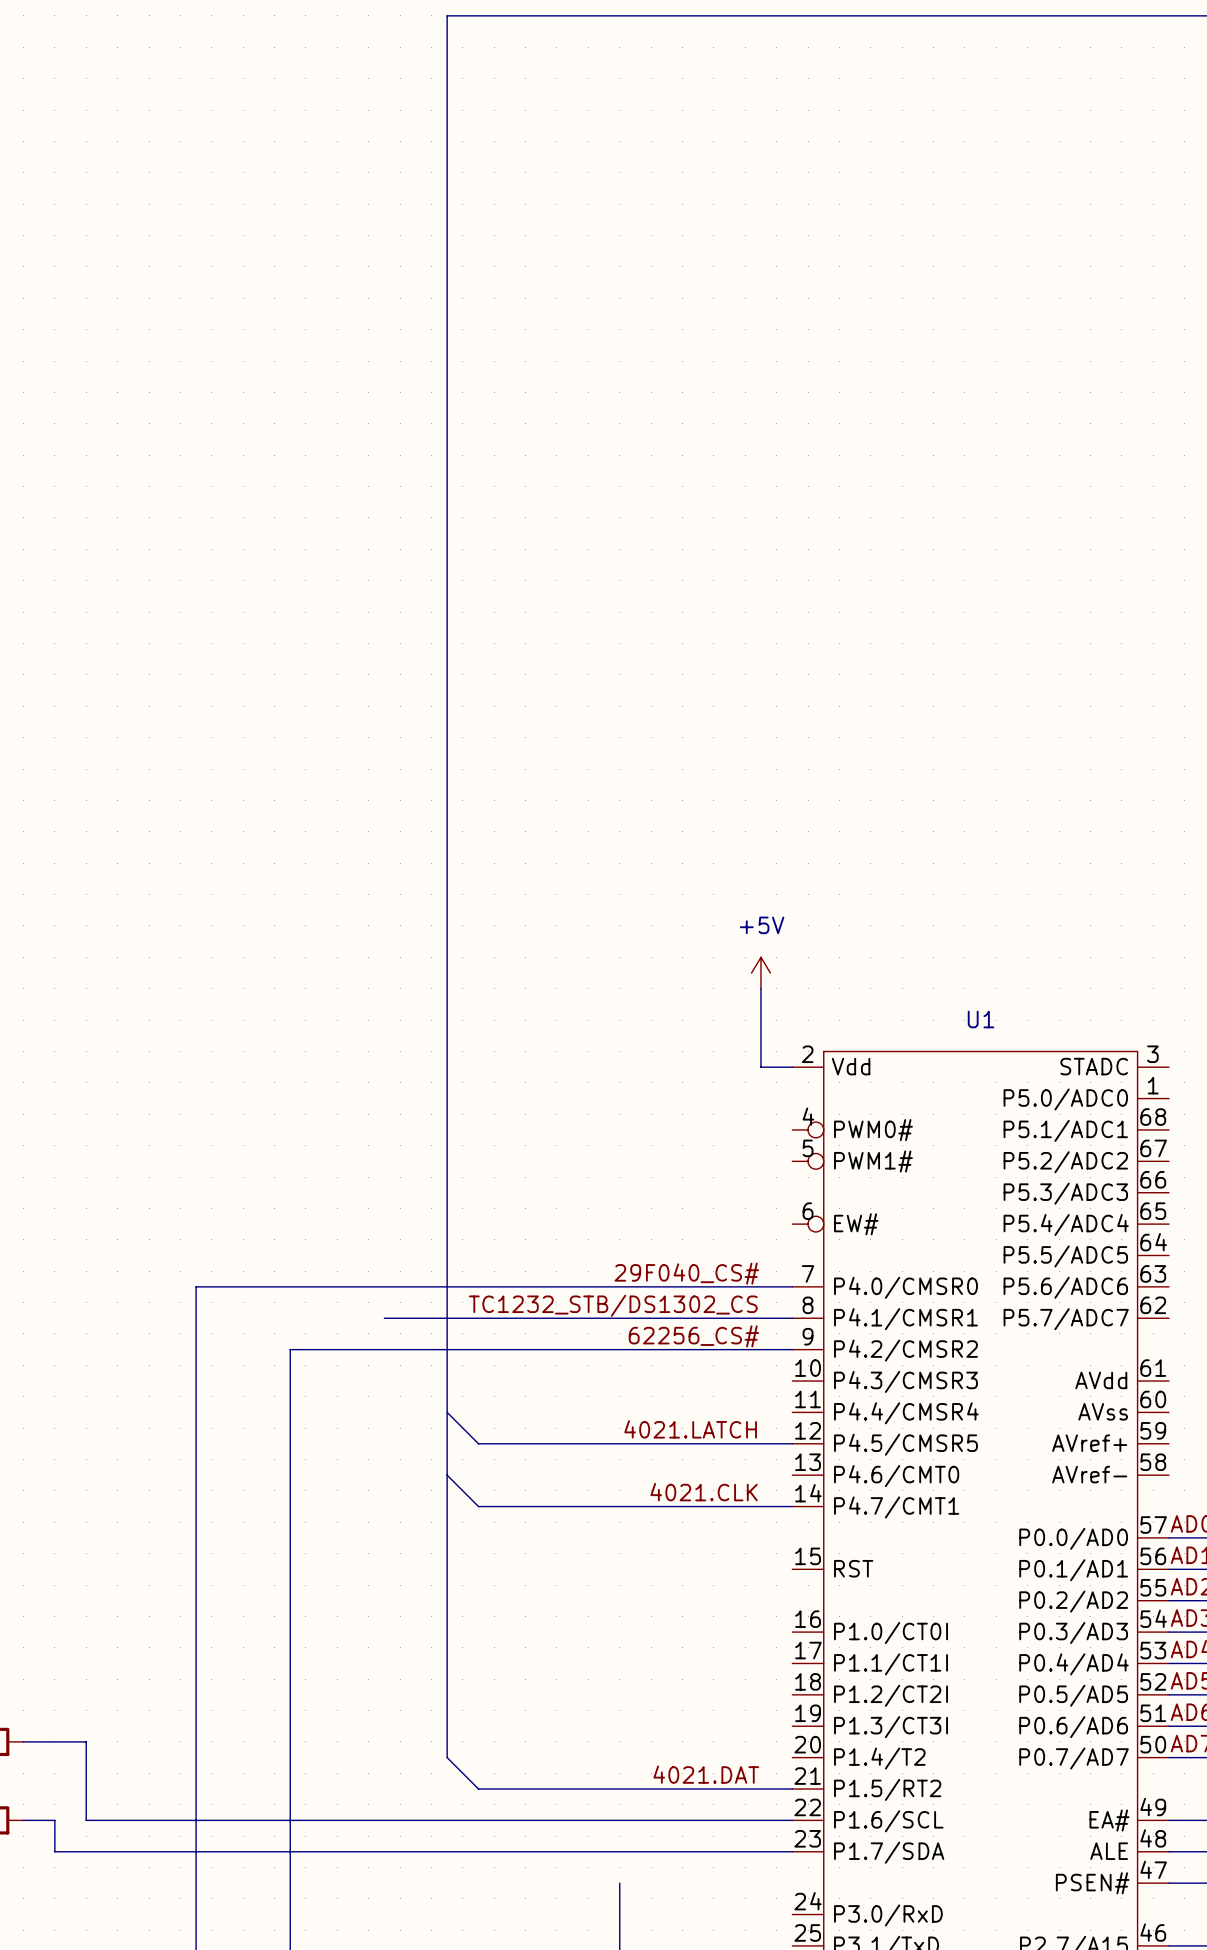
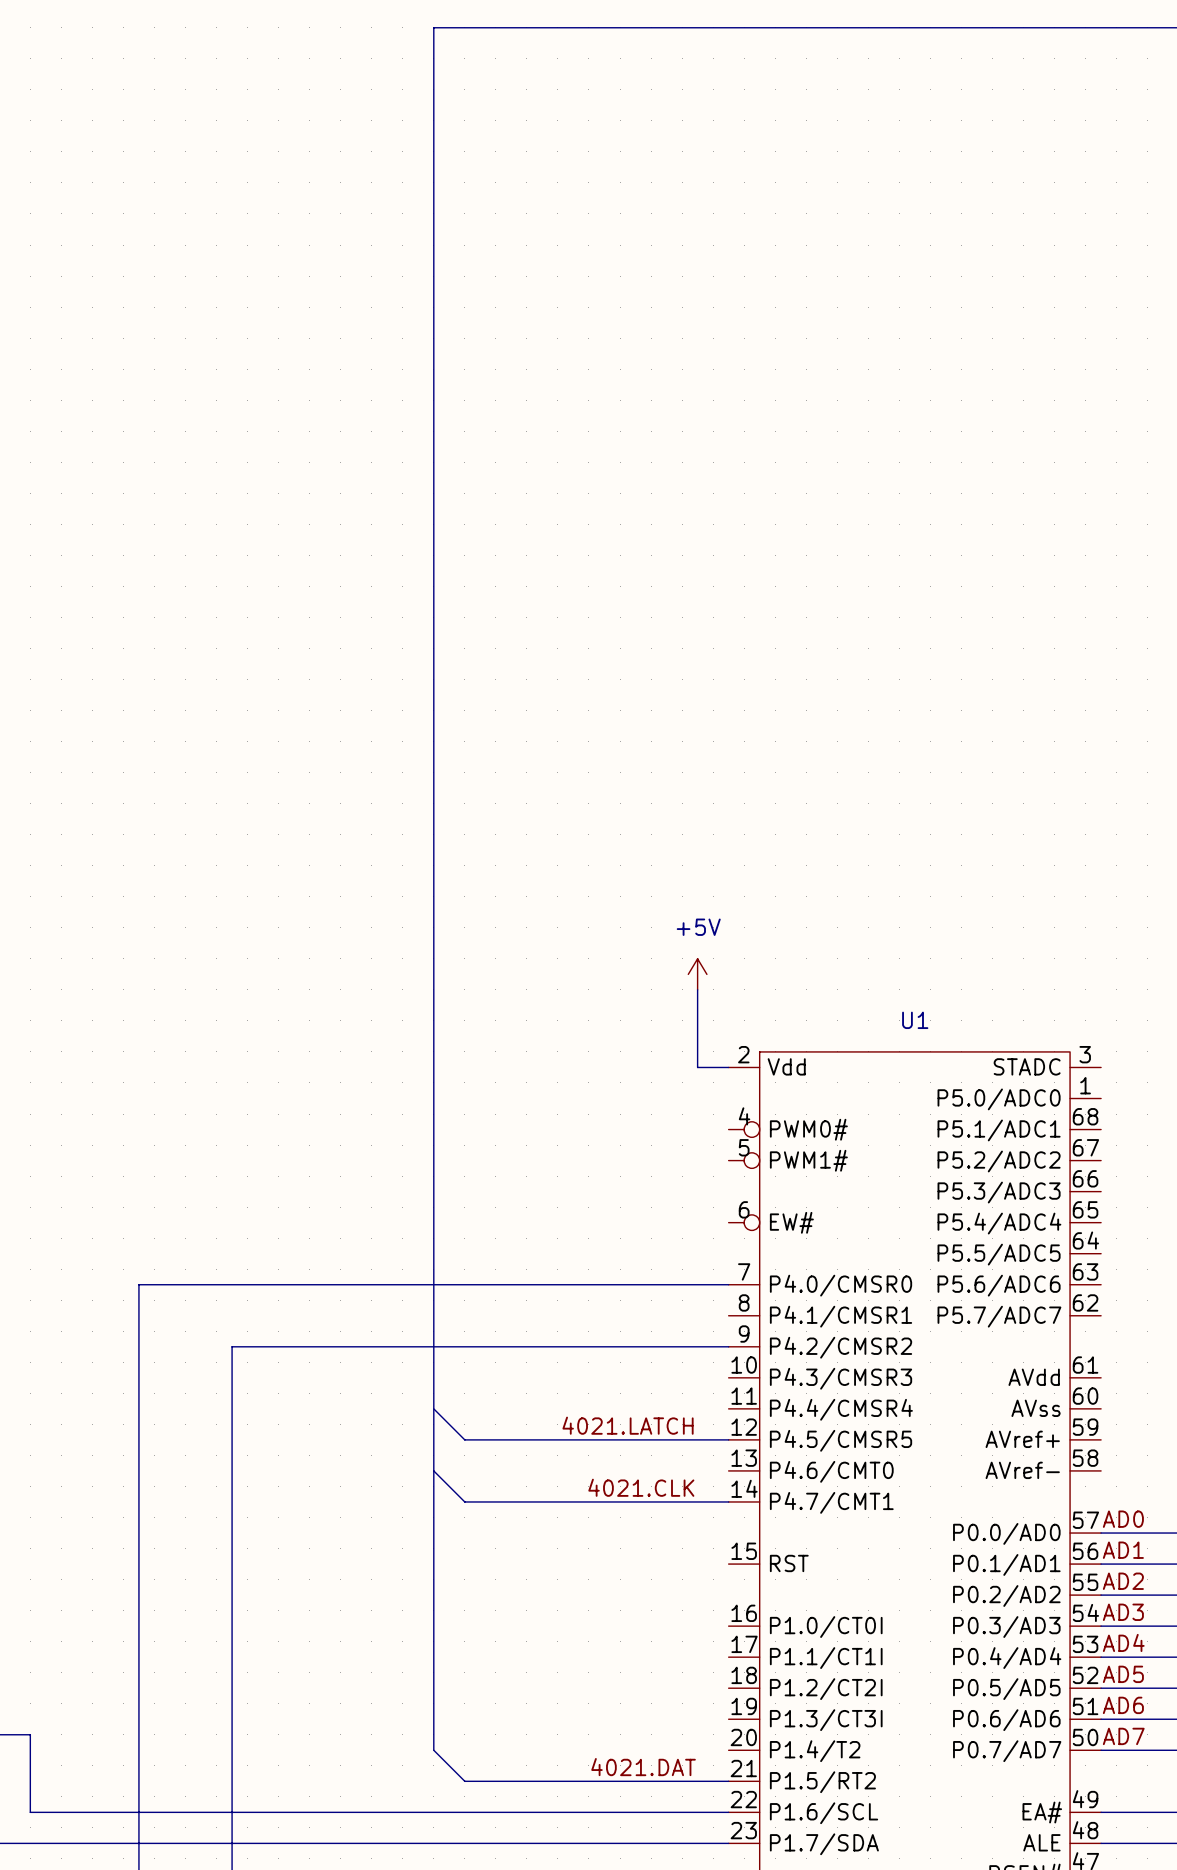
bus: (494, 15) (447, 15) (447, 1757) -> (433, 27) (433, 1750)
label: 29F040_CS# (686, 1273) -> none
label: TC1232_STB/DS1302_CS (613, 1305) -> none
wire: (384, 1318) (792, 1318) -> none
label: 62256_CS# (693, 1336) -> none
wire: (447, 1412) (478, 1443) (525, 1443) -> (433, 1408) (464, 1439)
wire: (447, 1475) (478, 1506) (525, 1506) -> (433, 1470) (464, 1501)
wire: (447, 1757) (478, 1789) (525, 1789) -> (433, 1750) (464, 1781)

